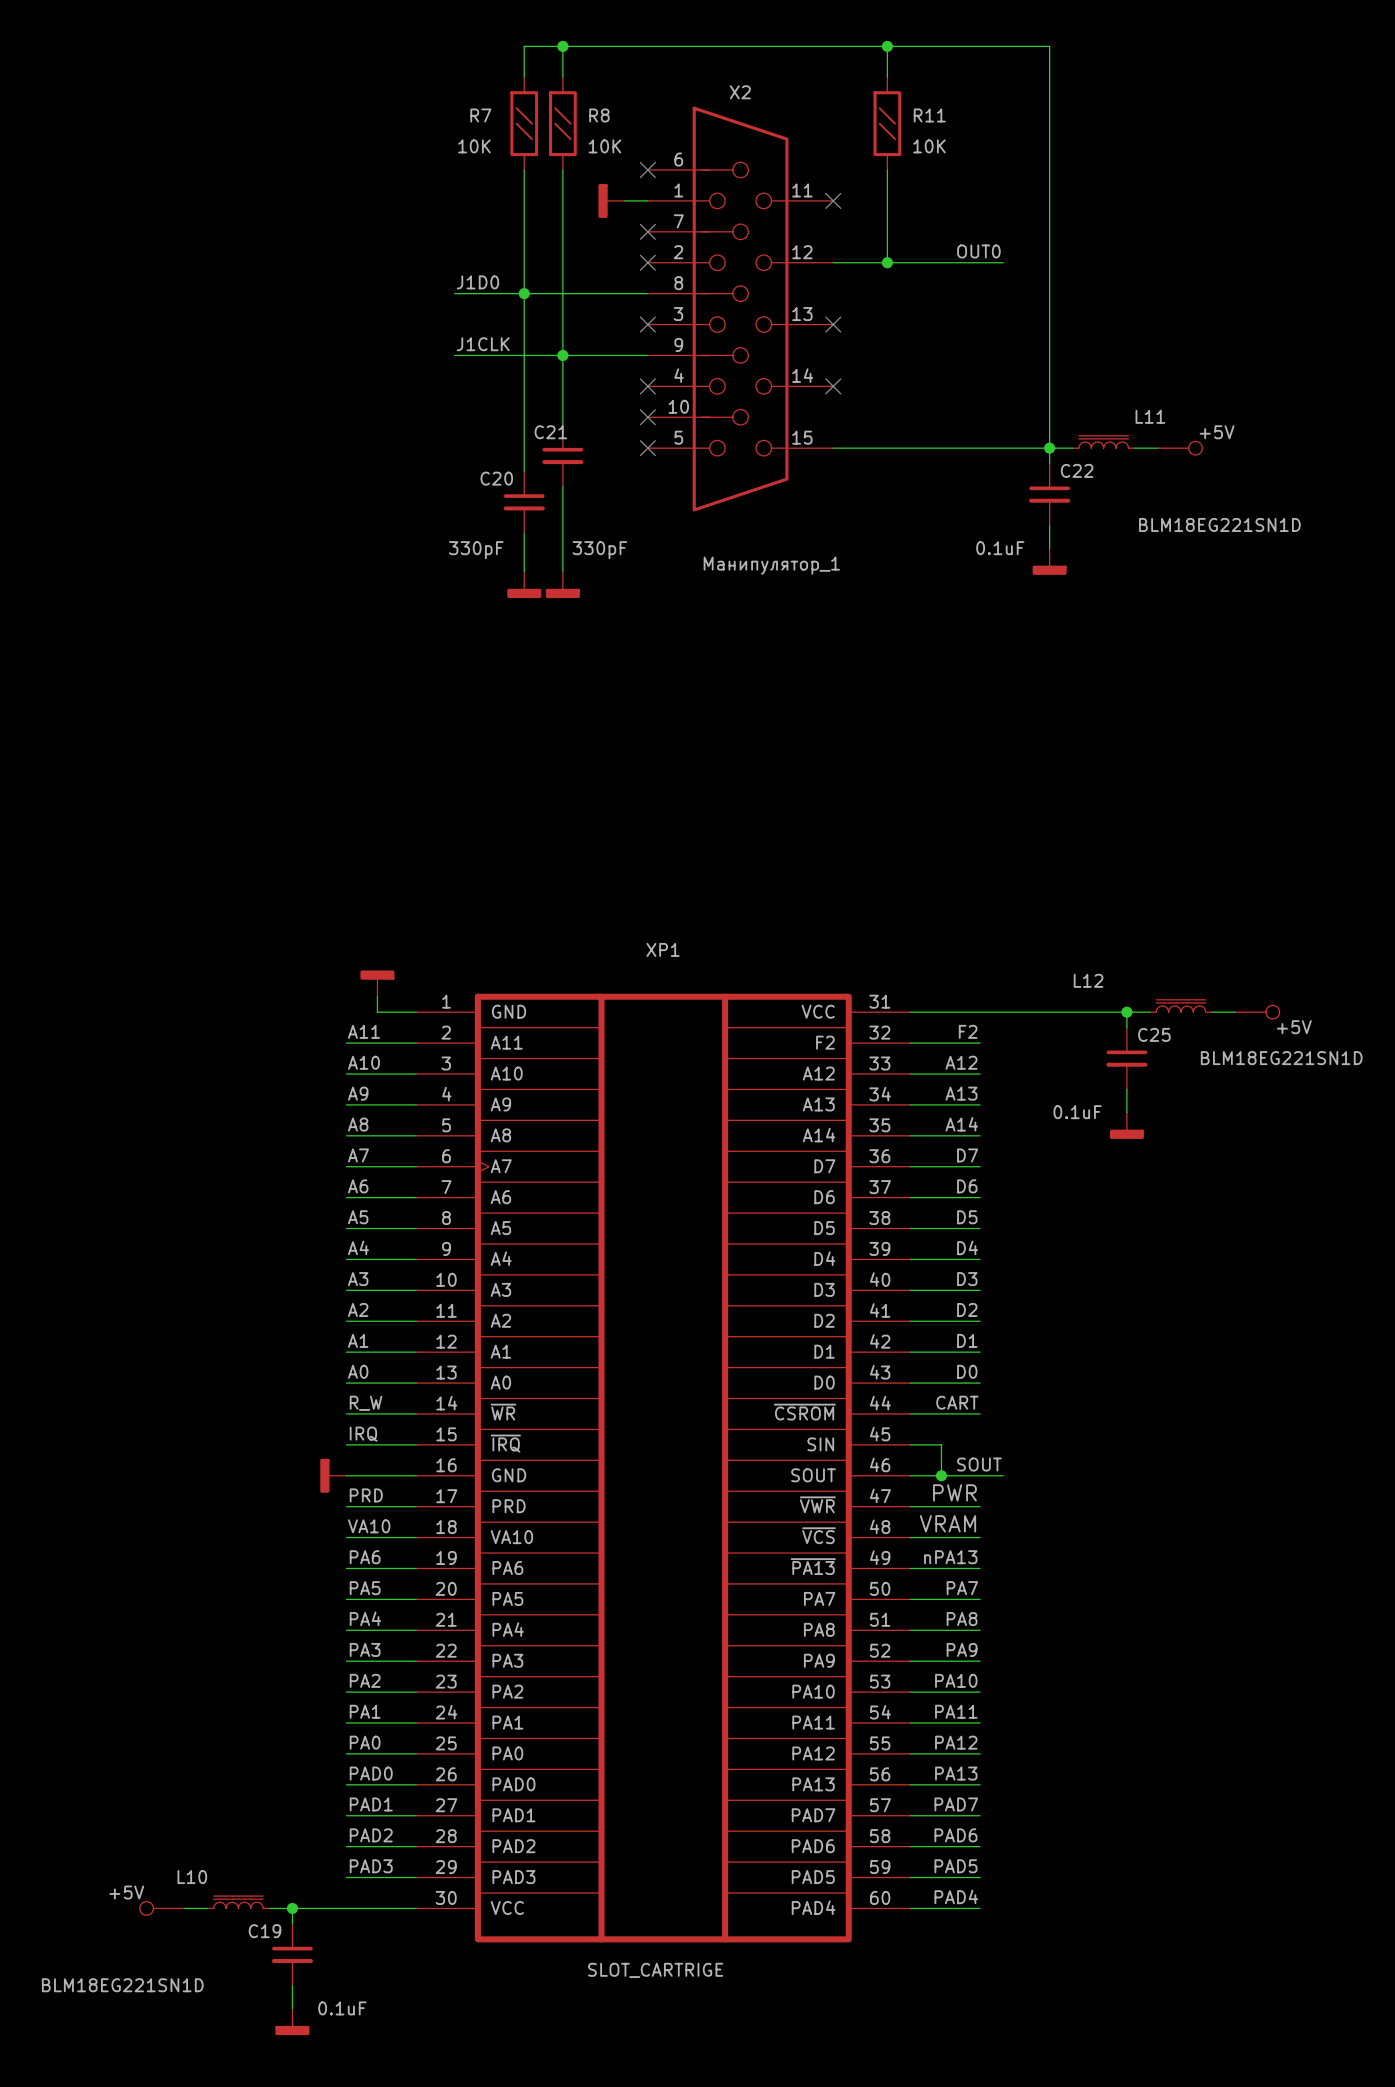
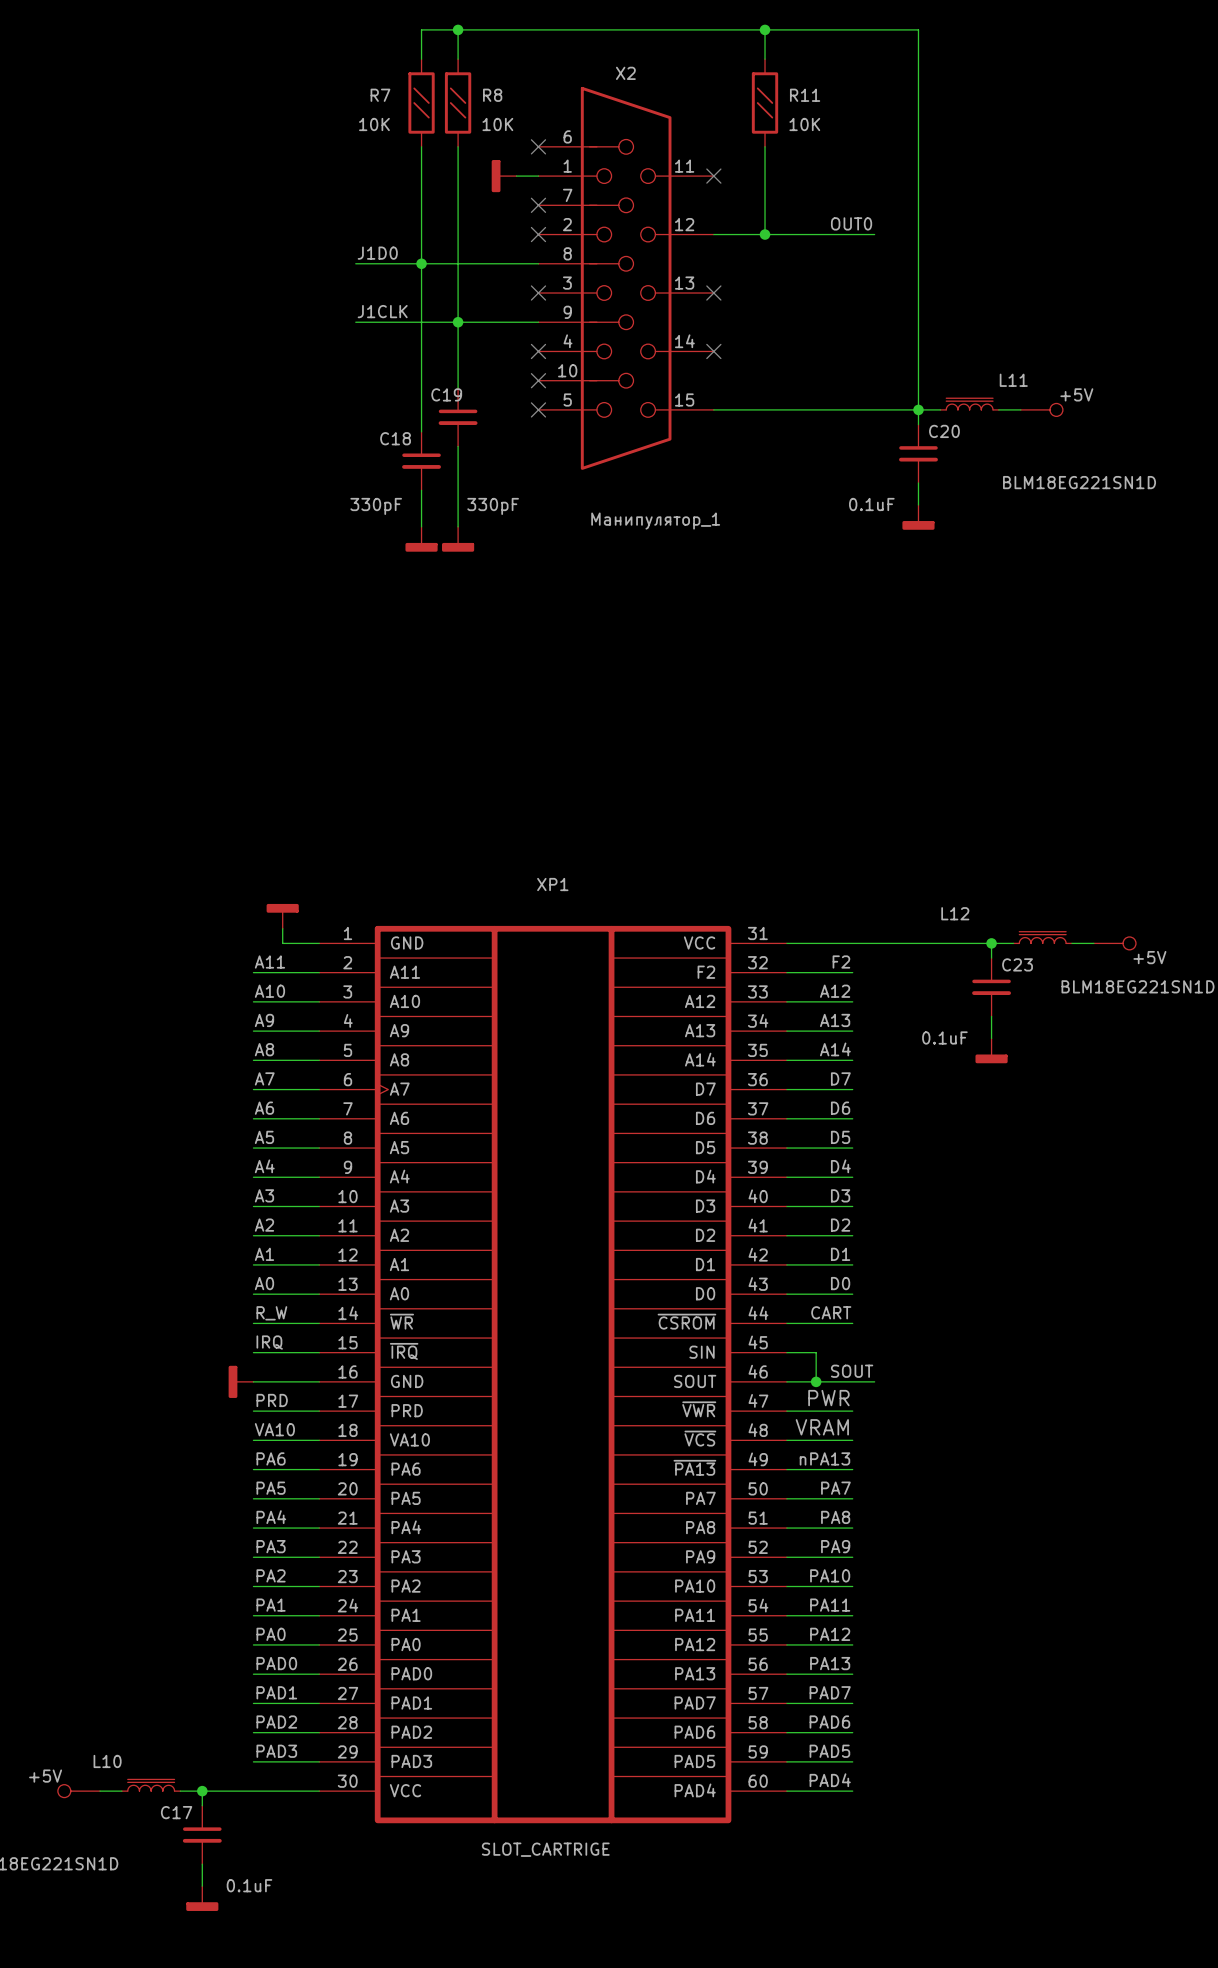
C21 name: C21 (550, 432) -> C19 (446, 394)
C22 name: C22 (1077, 470) -> C20 (944, 431)
C20 name: C20 (496, 478) -> C18 (395, 438)
C25 name: C25 (1154, 1034) -> C23 (1017, 964)
C19 name: C19 (264, 1931) -> C17 (176, 1812)

